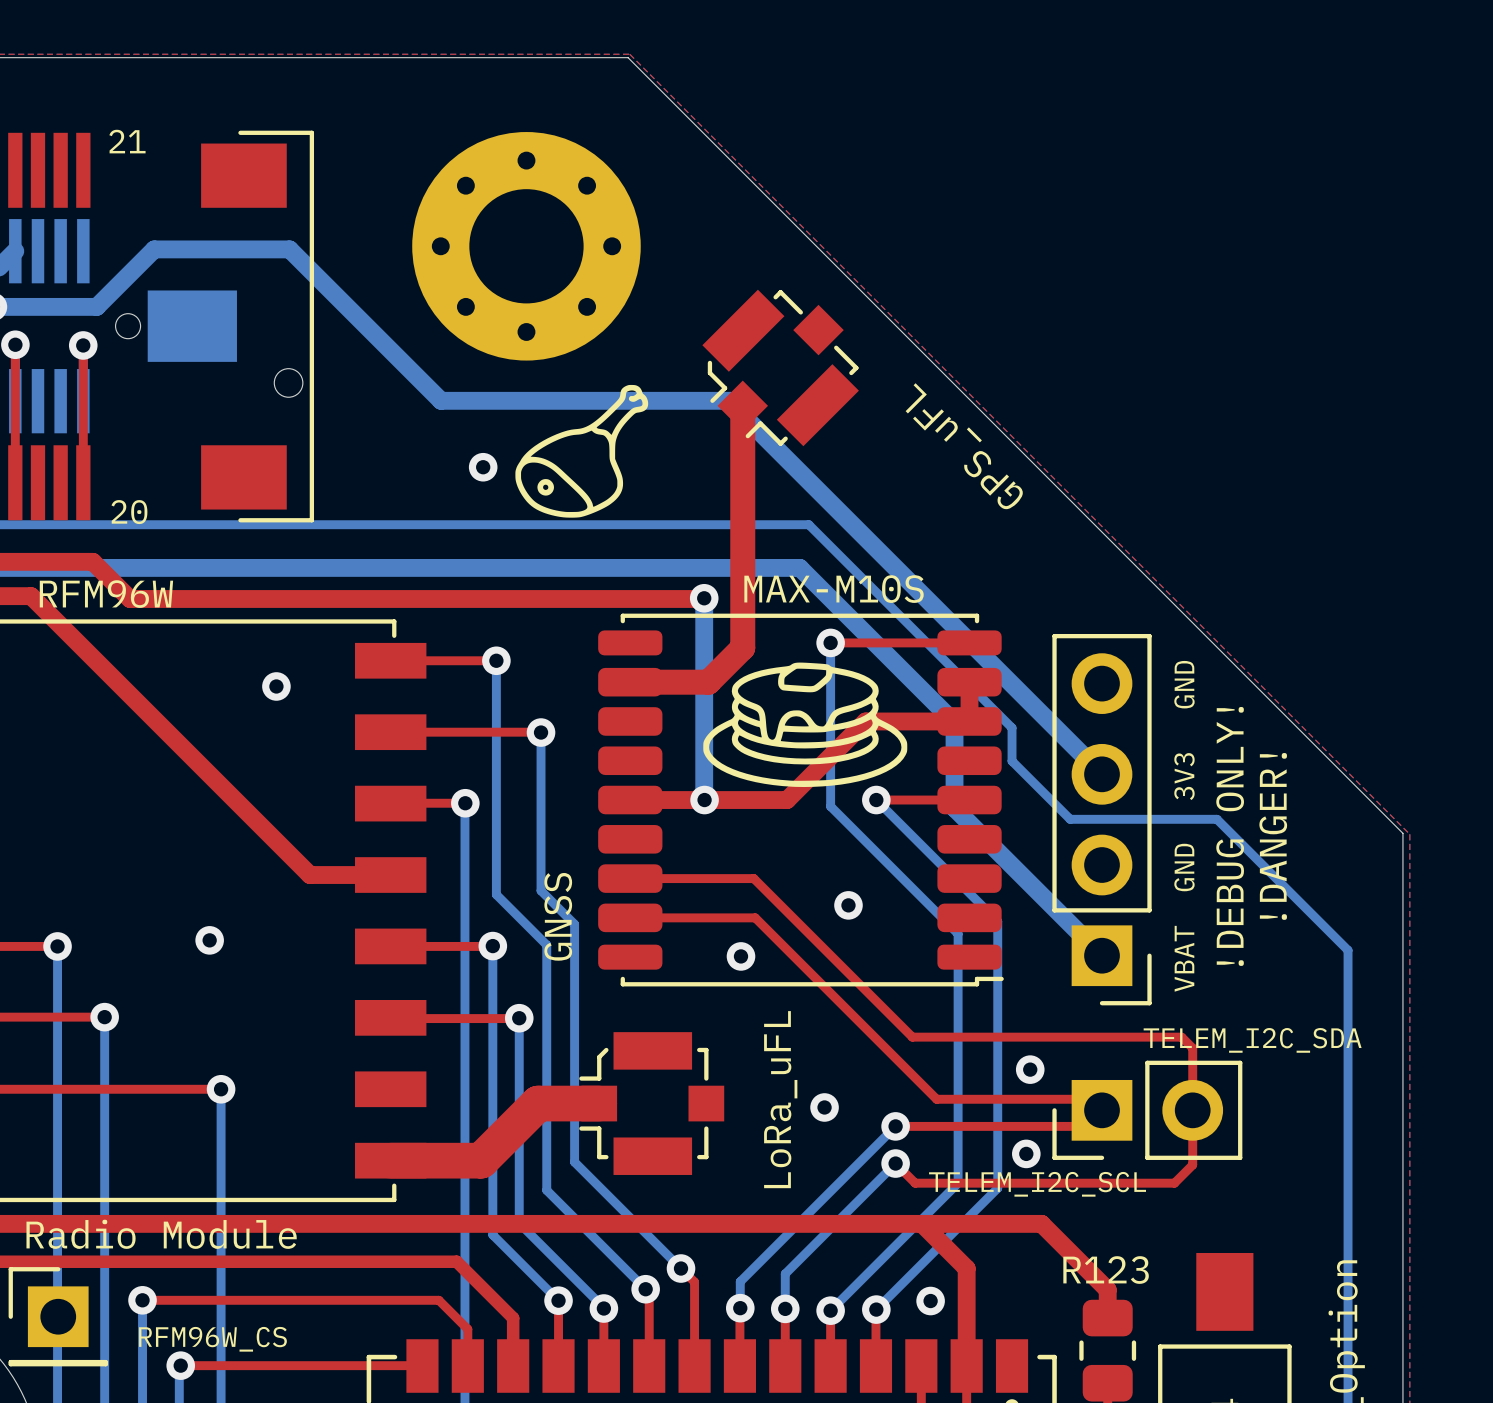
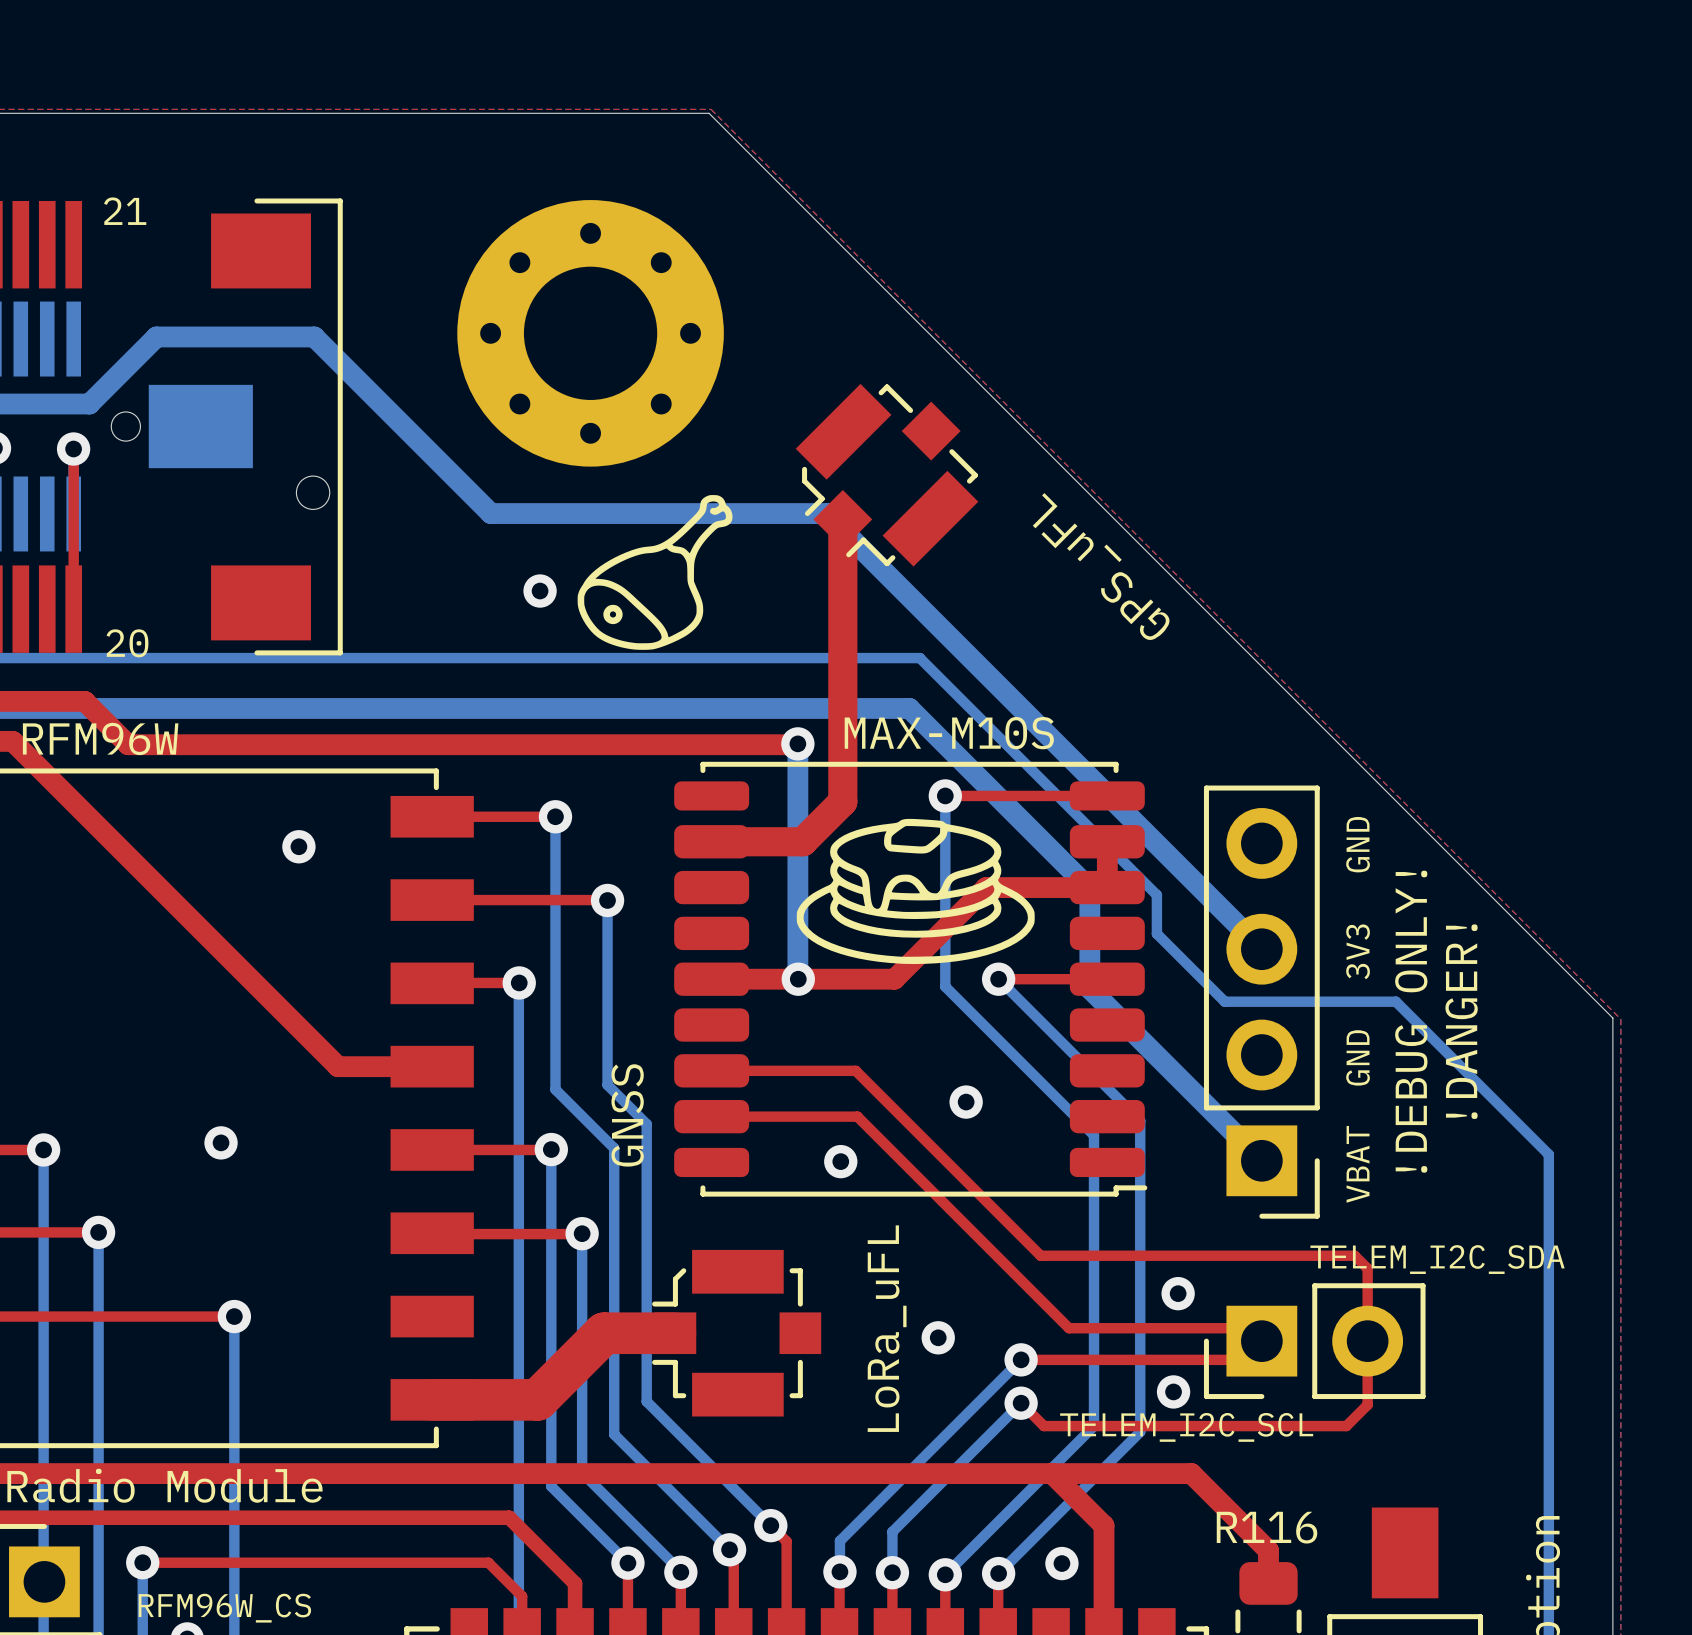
R123 name: R123 (1106, 1270) -> R116 (1267, 1527)

